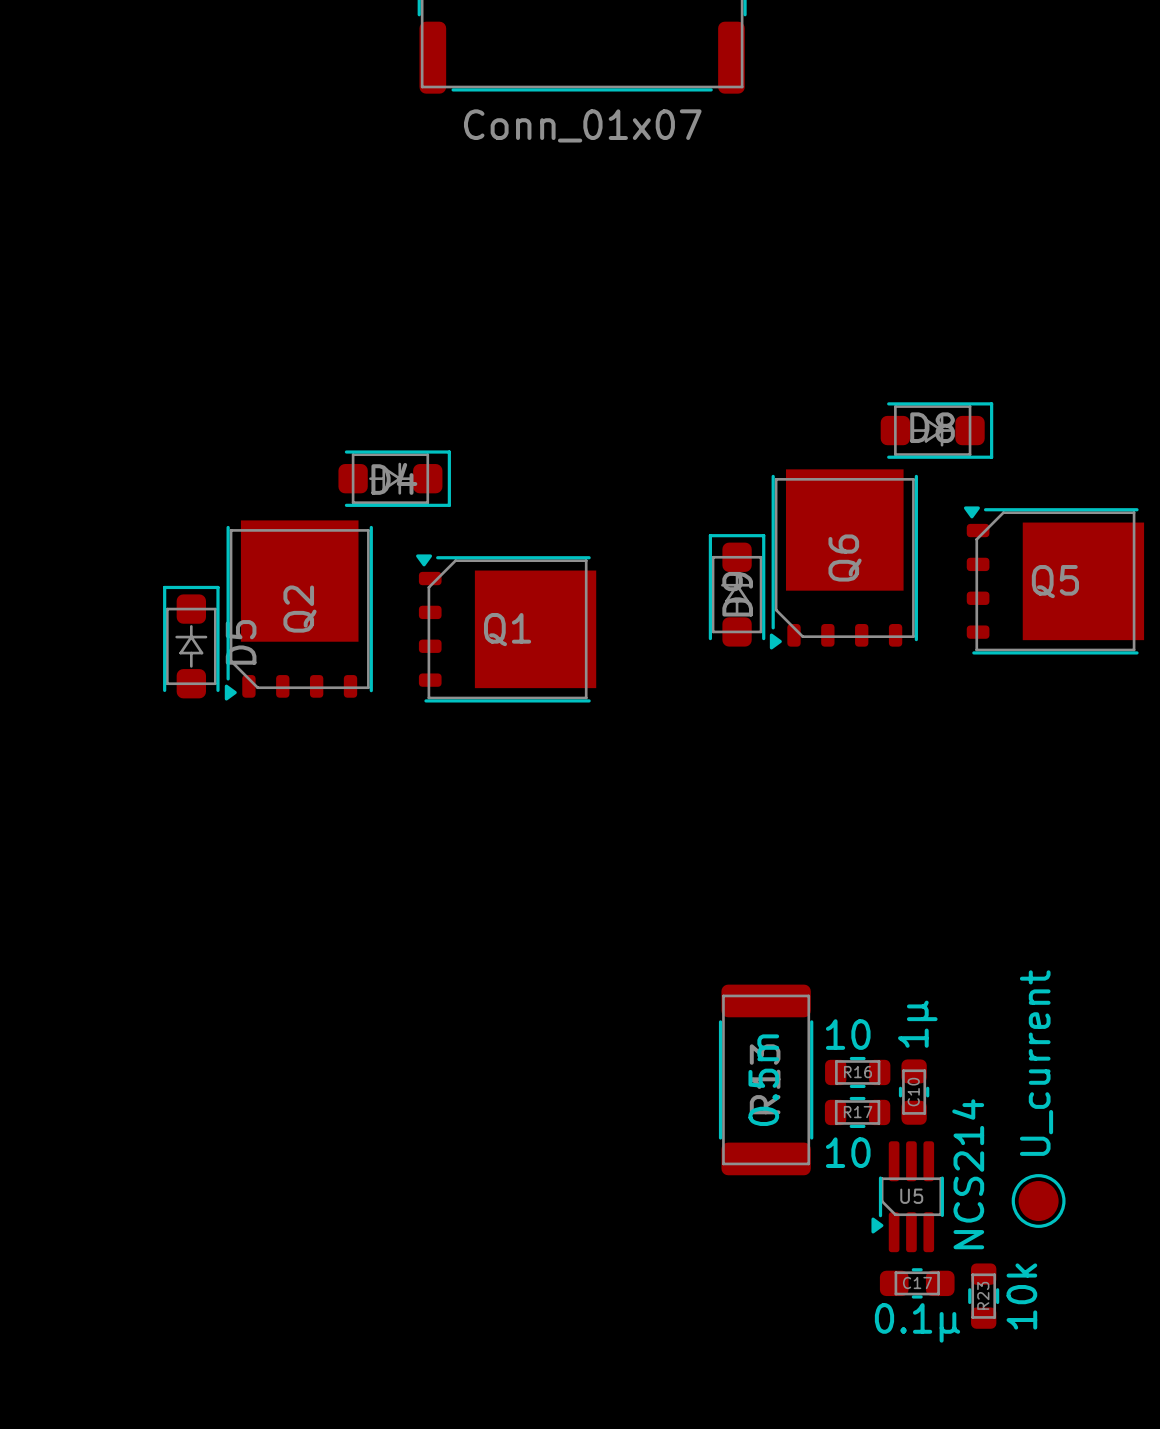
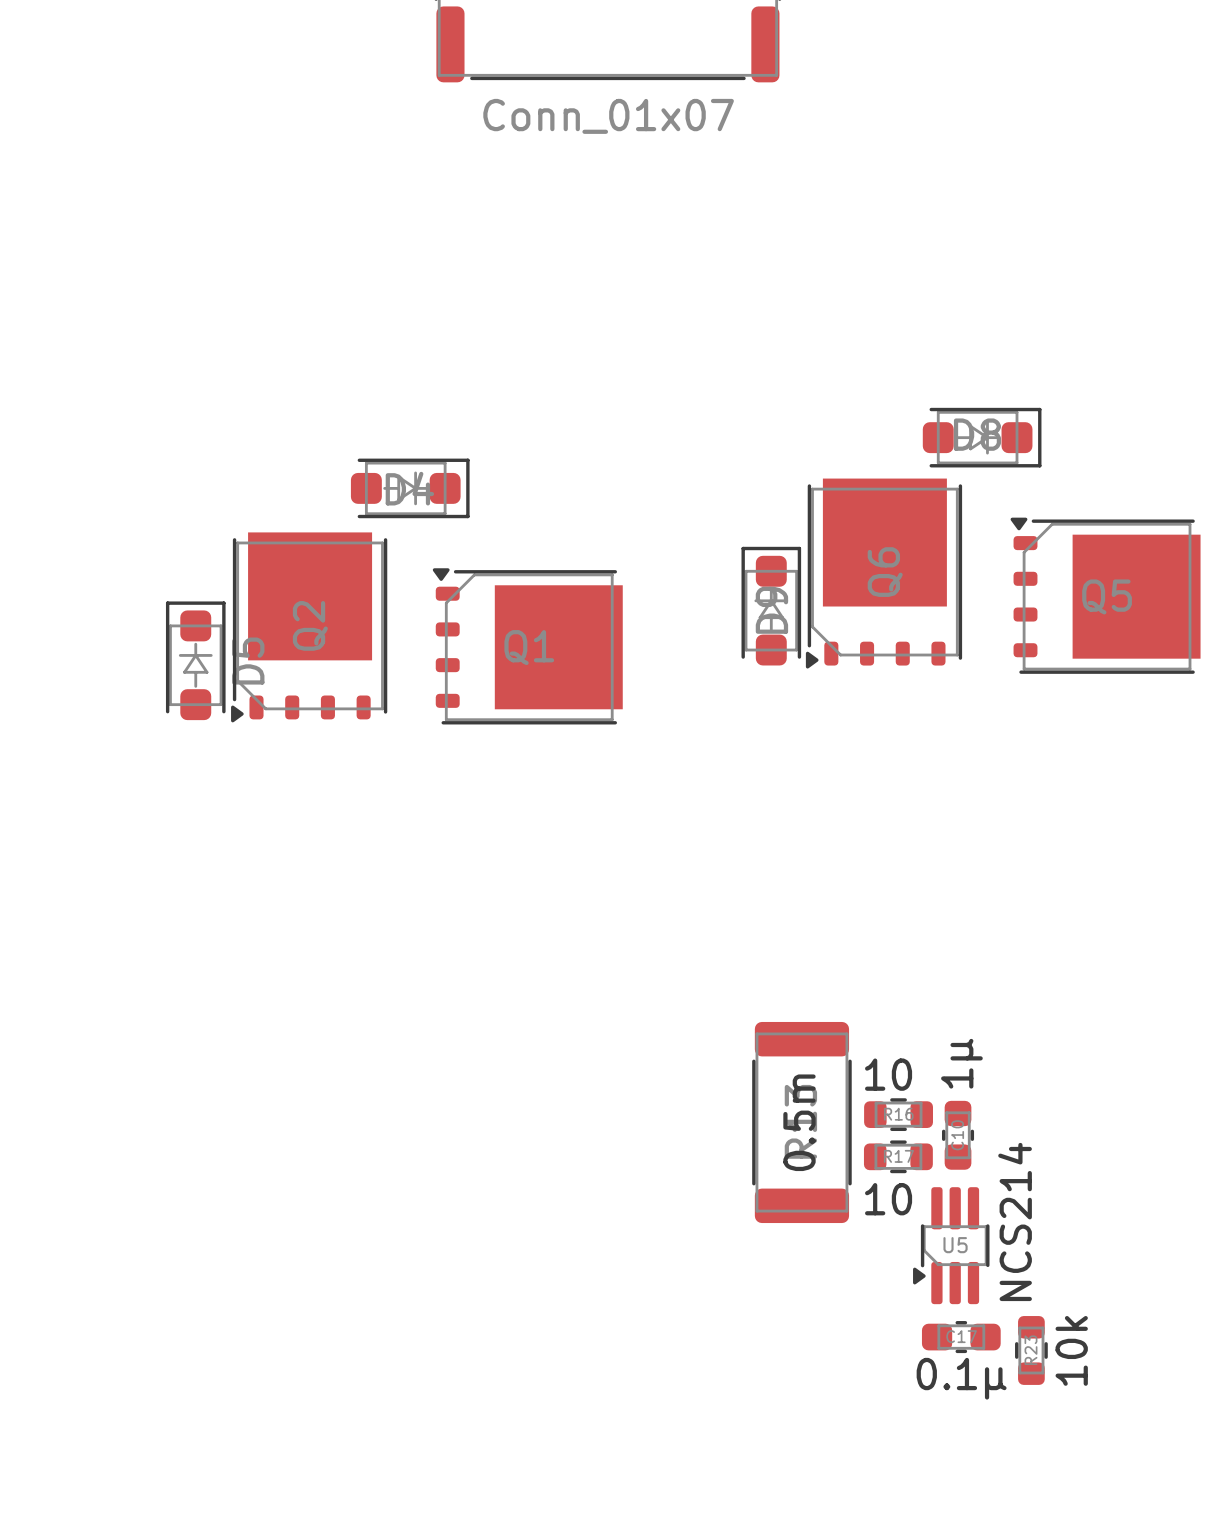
part: U_current (1038, 1200) -> none

